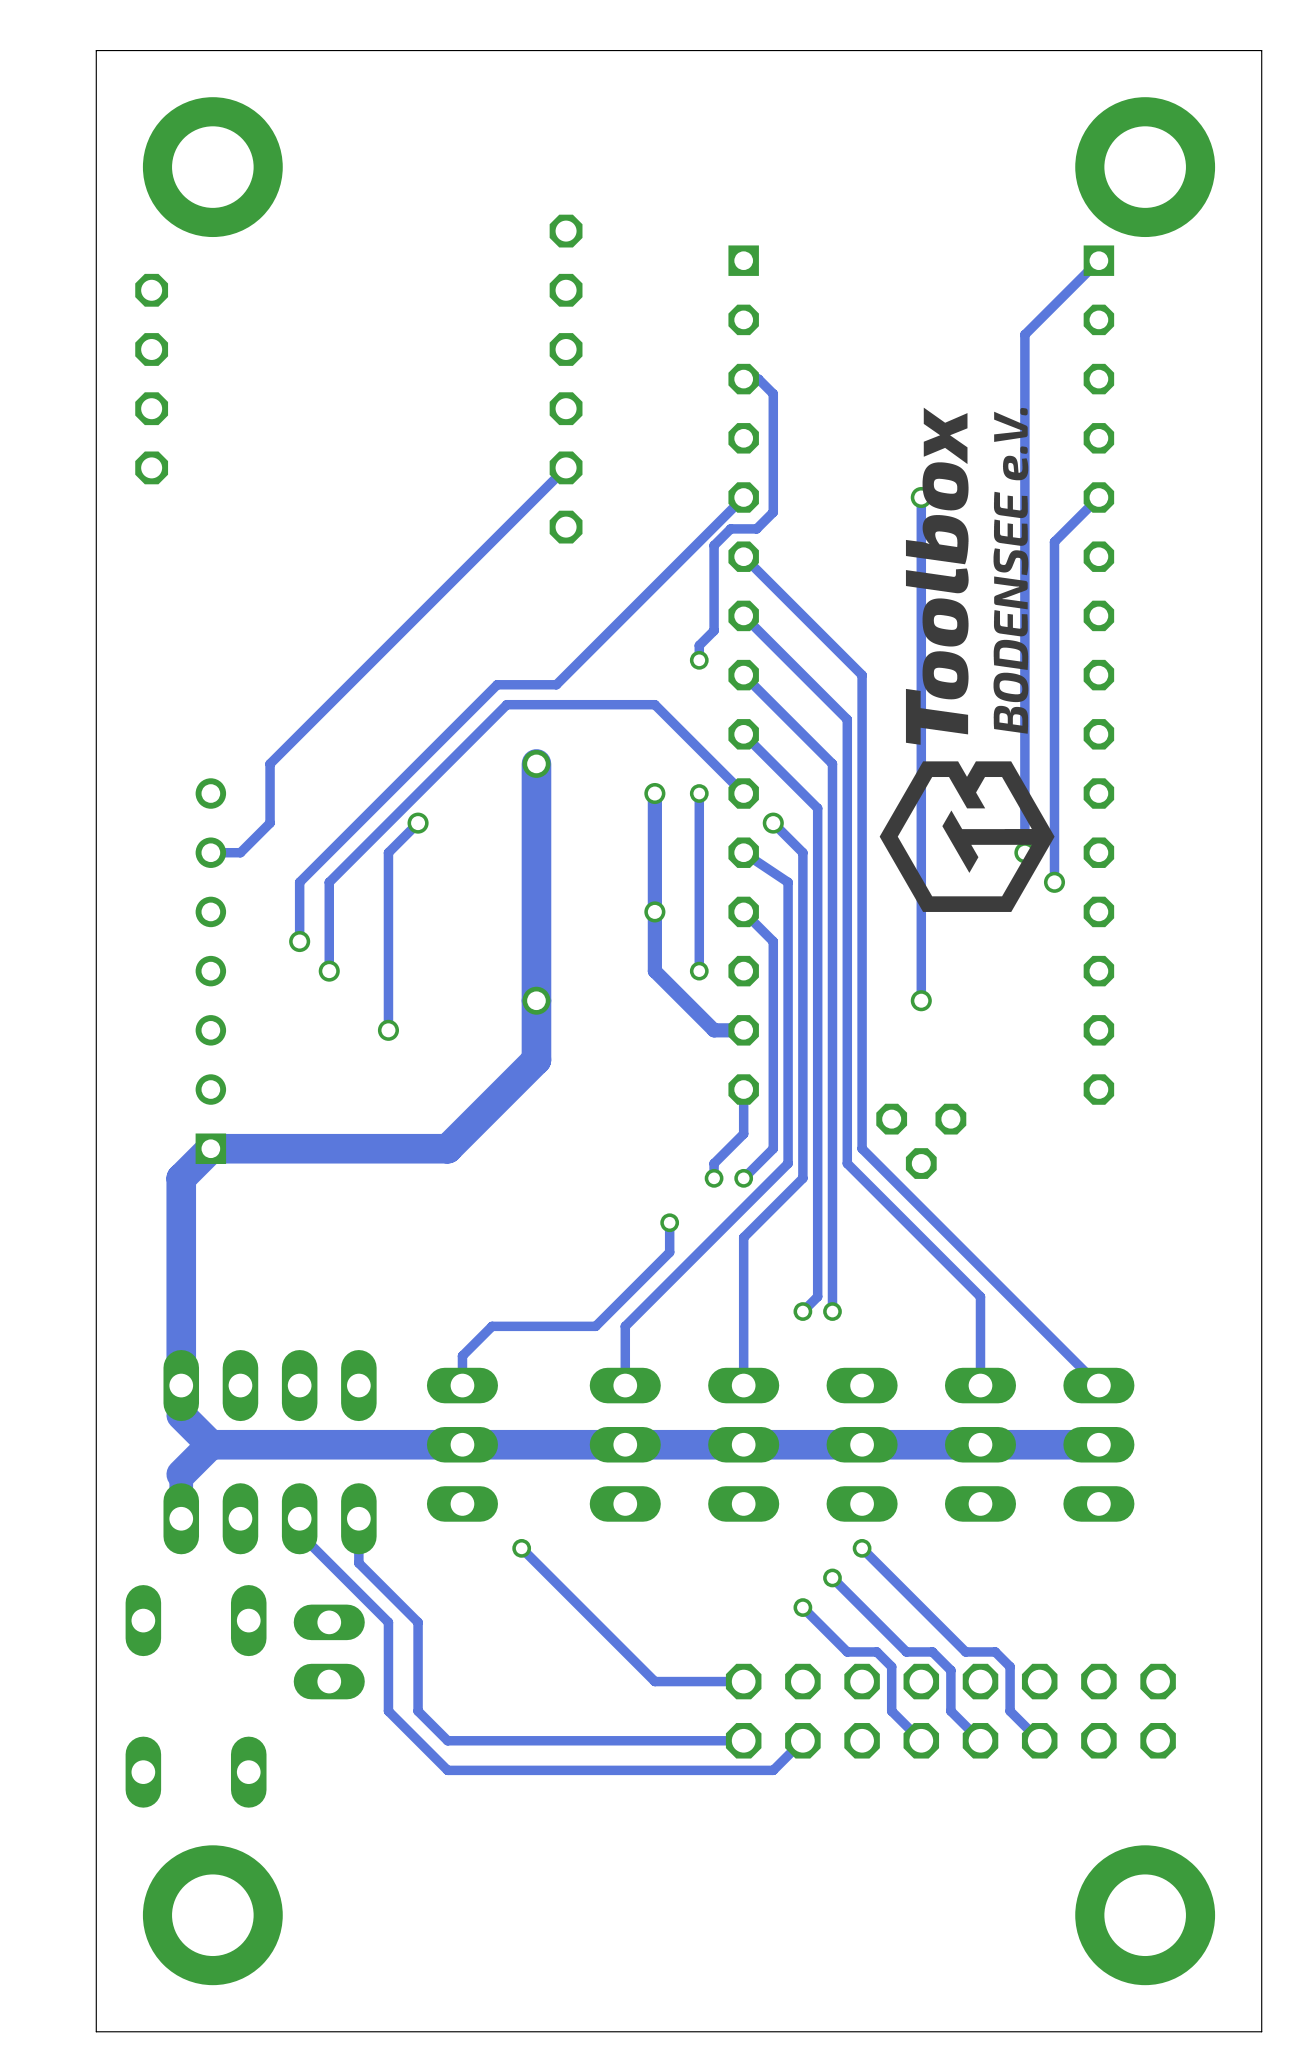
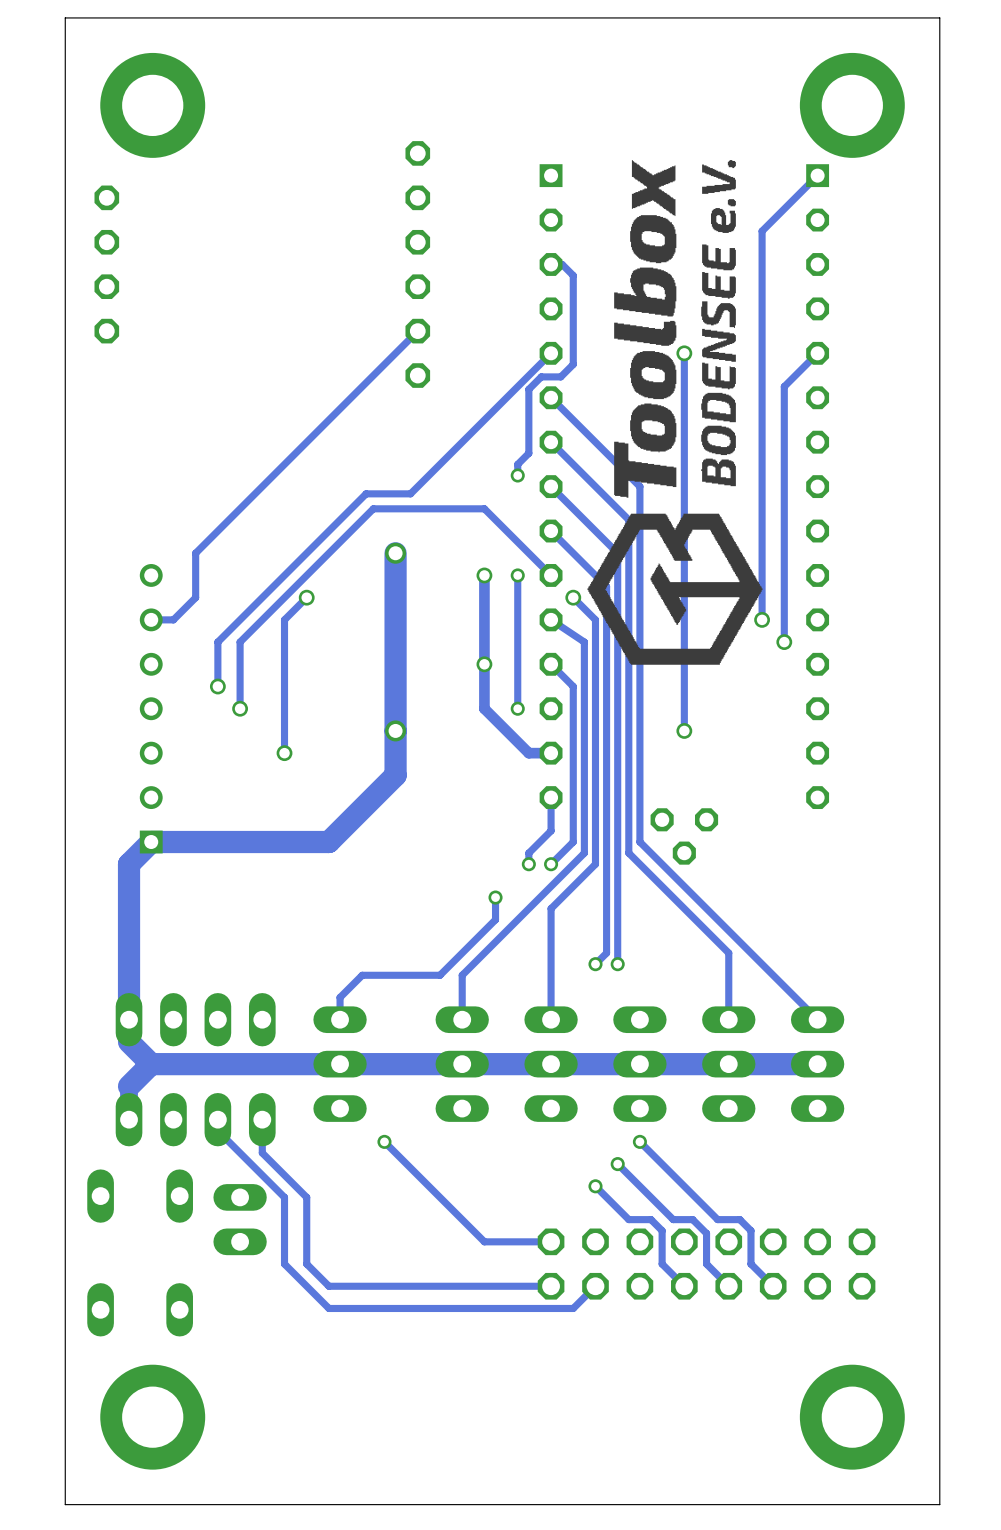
drawing: none -> [587, 160, 763, 665]
drawing: [879, 407, 1055, 912] -> none

